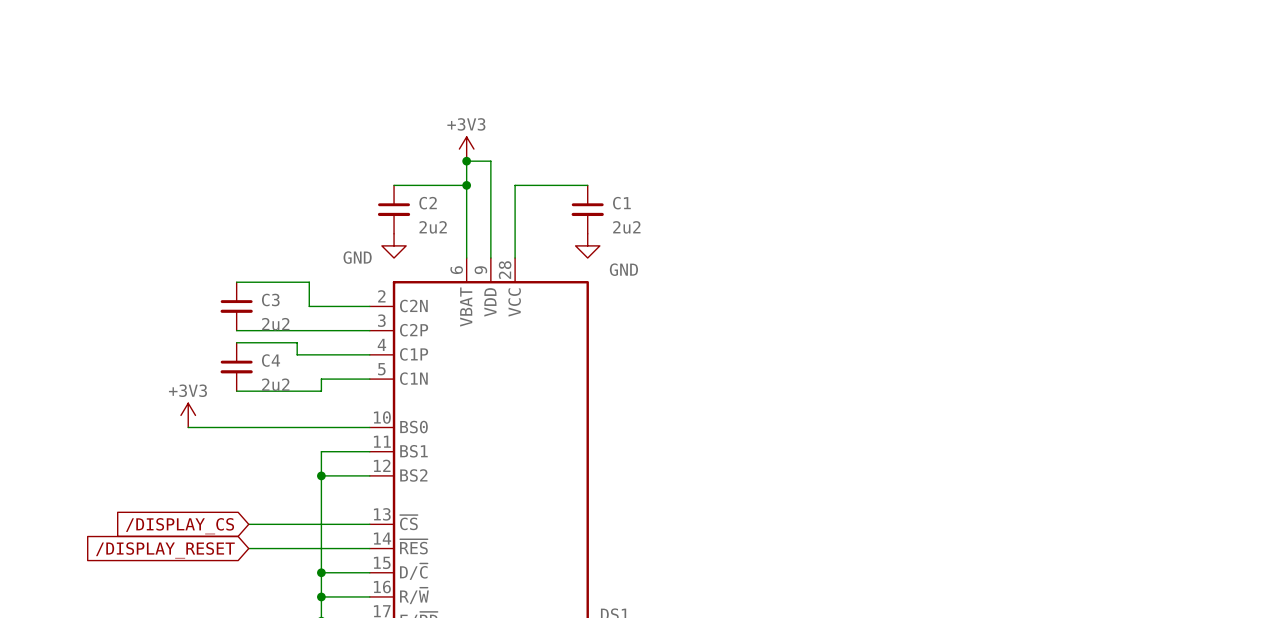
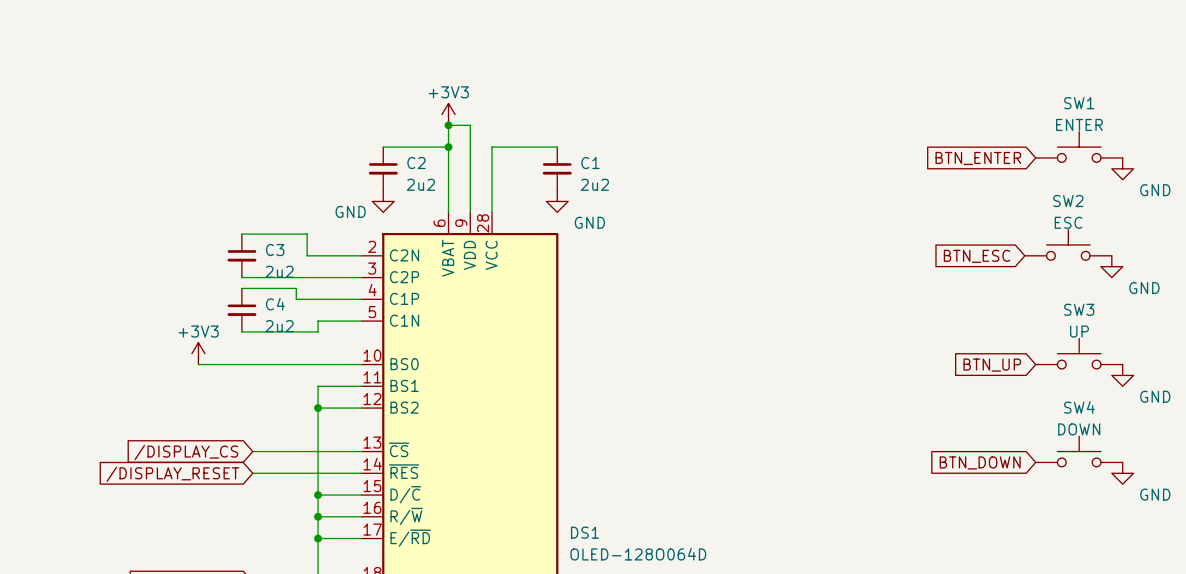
SW1: none -> ENTER (1079, 147)
global label: none -> BTN_ENTER (978, 158)
power symbol: none -> GND (1122, 168)
SW2: none -> ESC (1068, 244)
global label: none -> BTN_ESC (977, 256)
power symbol: none -> GND (1111, 266)
SW3: none -> UP (1079, 353)
global label: none -> BTN_UP (992, 365)
power symbol: none -> GND (1122, 375)
SW4: none -> DOWN (1079, 451)
global label: none -> BTN_DOWN (980, 462)
power symbol: none -> GND (1122, 473)

